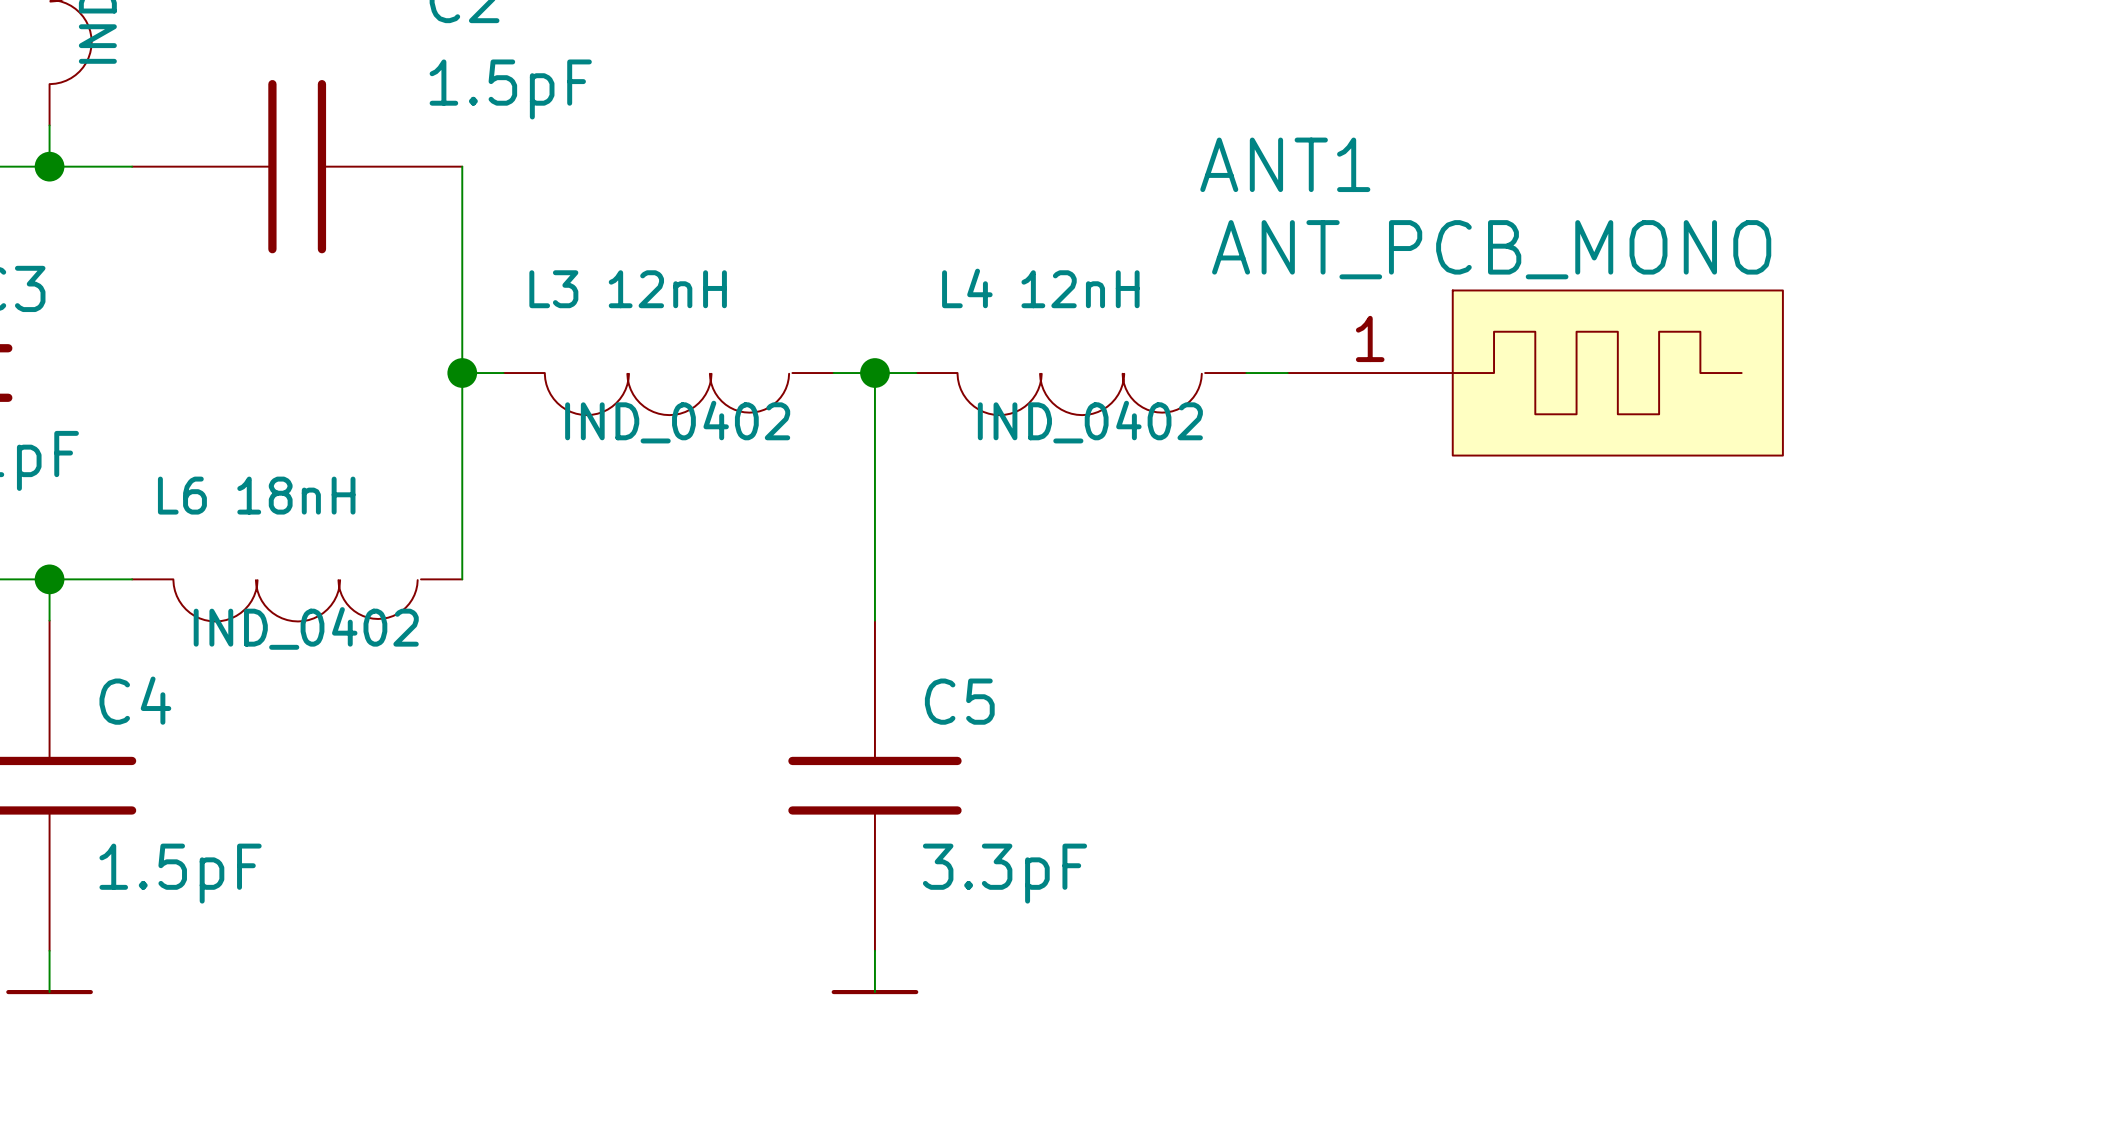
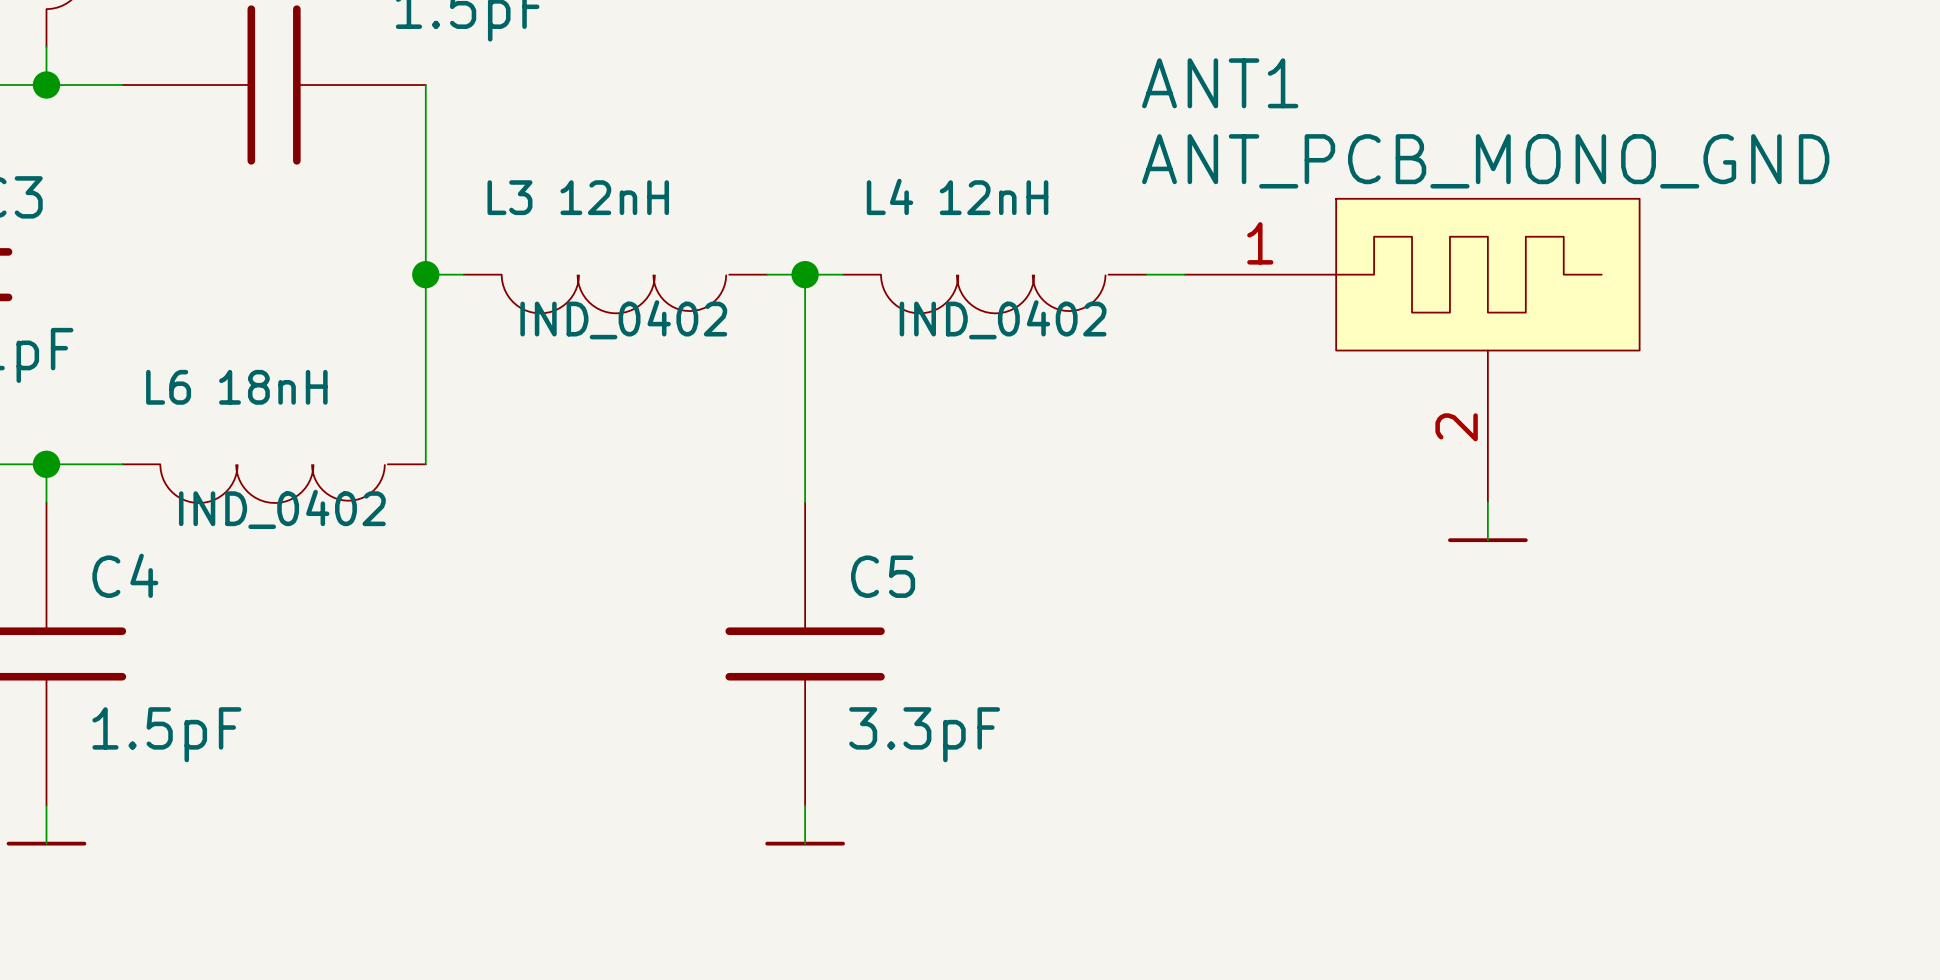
ANT1 name position: ANT1 (1285, 164) -> ANT1 (1220, 83)
ANT1 value: ANT_PCB_MONO (1491, 249) -> ANT_PCB_MONO_GND (1485, 161)
ANT1 symbol: [1287, 290, 1783, 456] -> [1184, 198, 1640, 503]
wire: none -> (1487, 502) (1487, 540)
power symbol: none -> (1487, 540)

